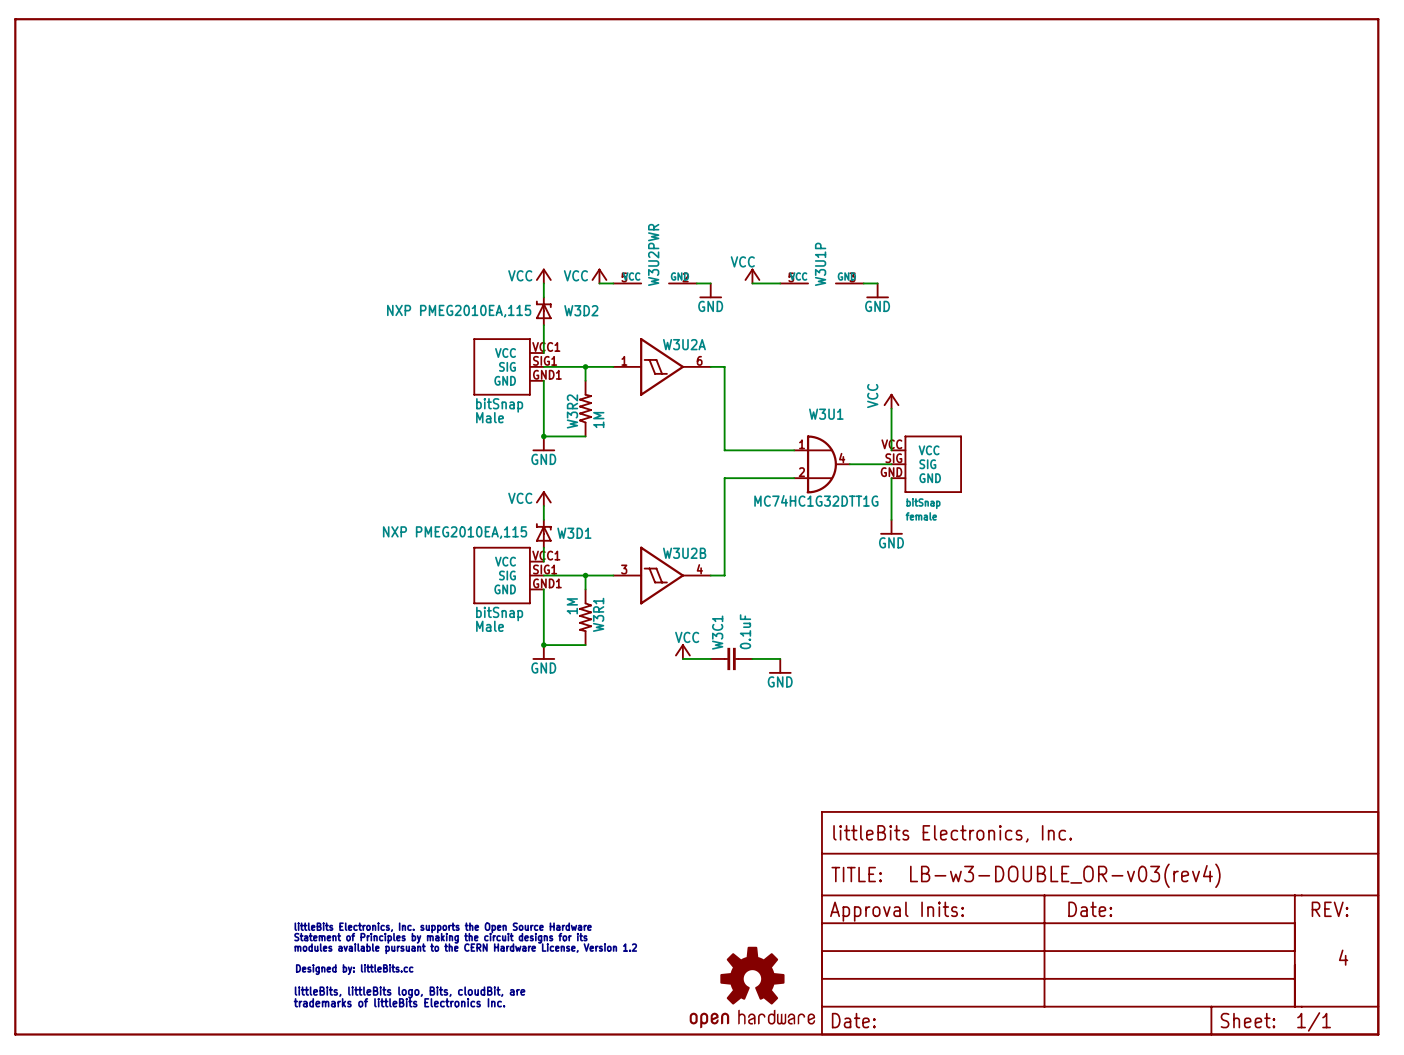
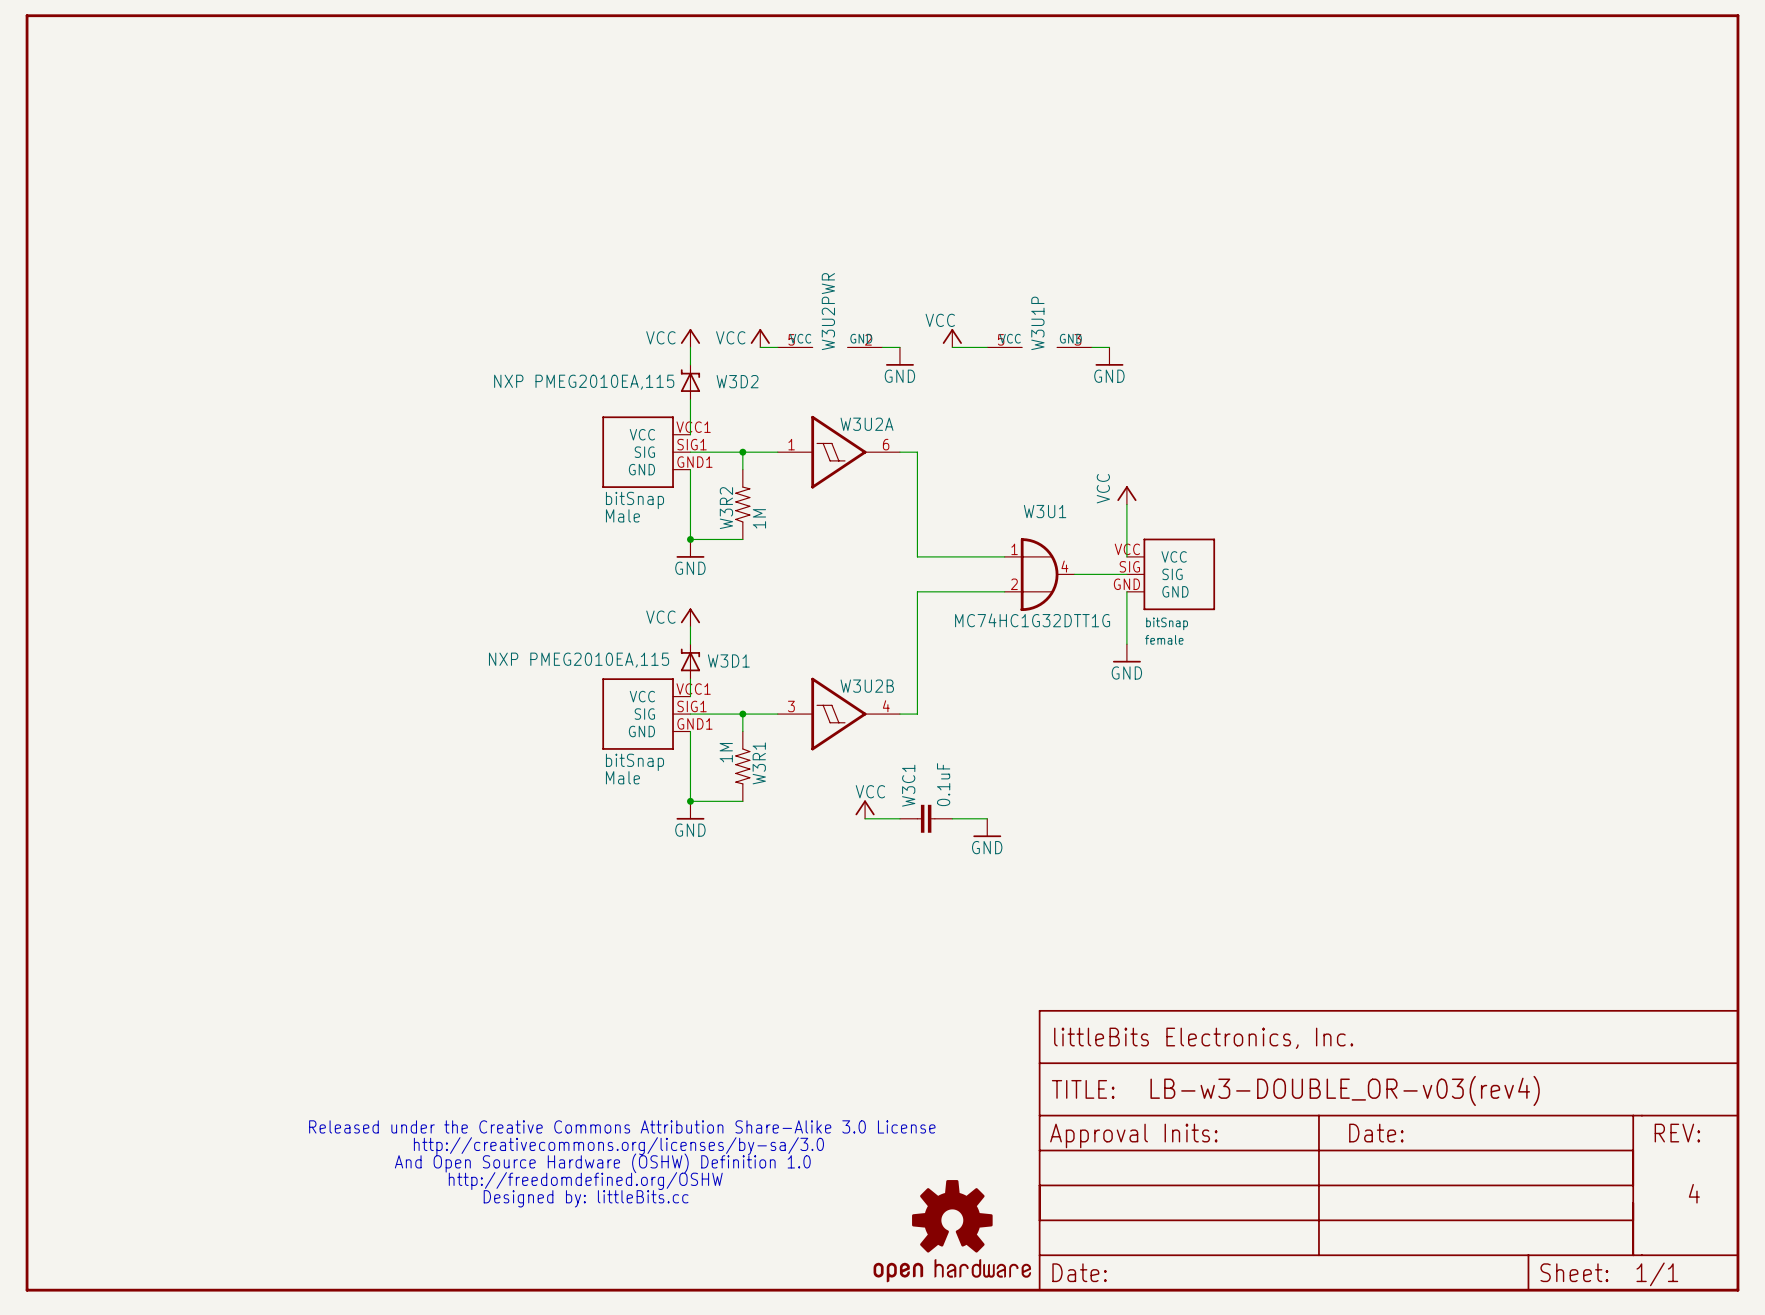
part: none -> (622, 1163)
part: (465, 964) -> none

